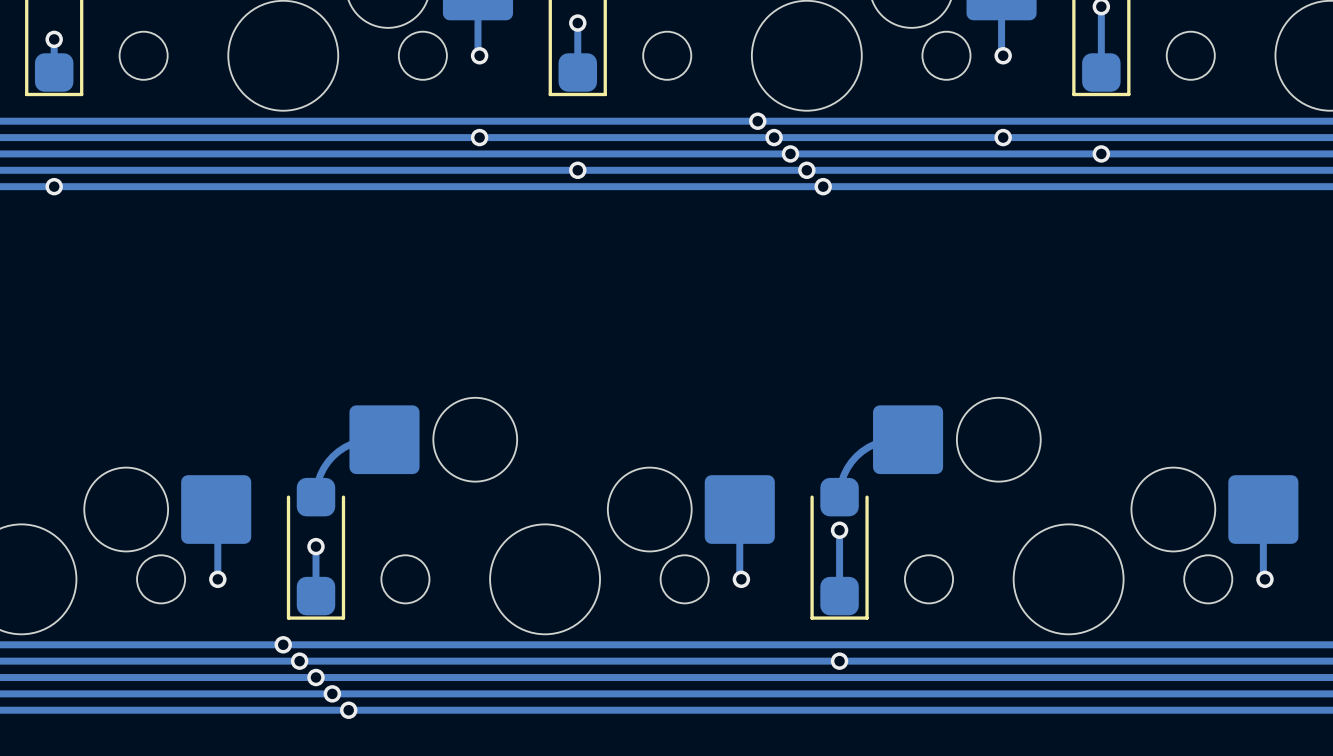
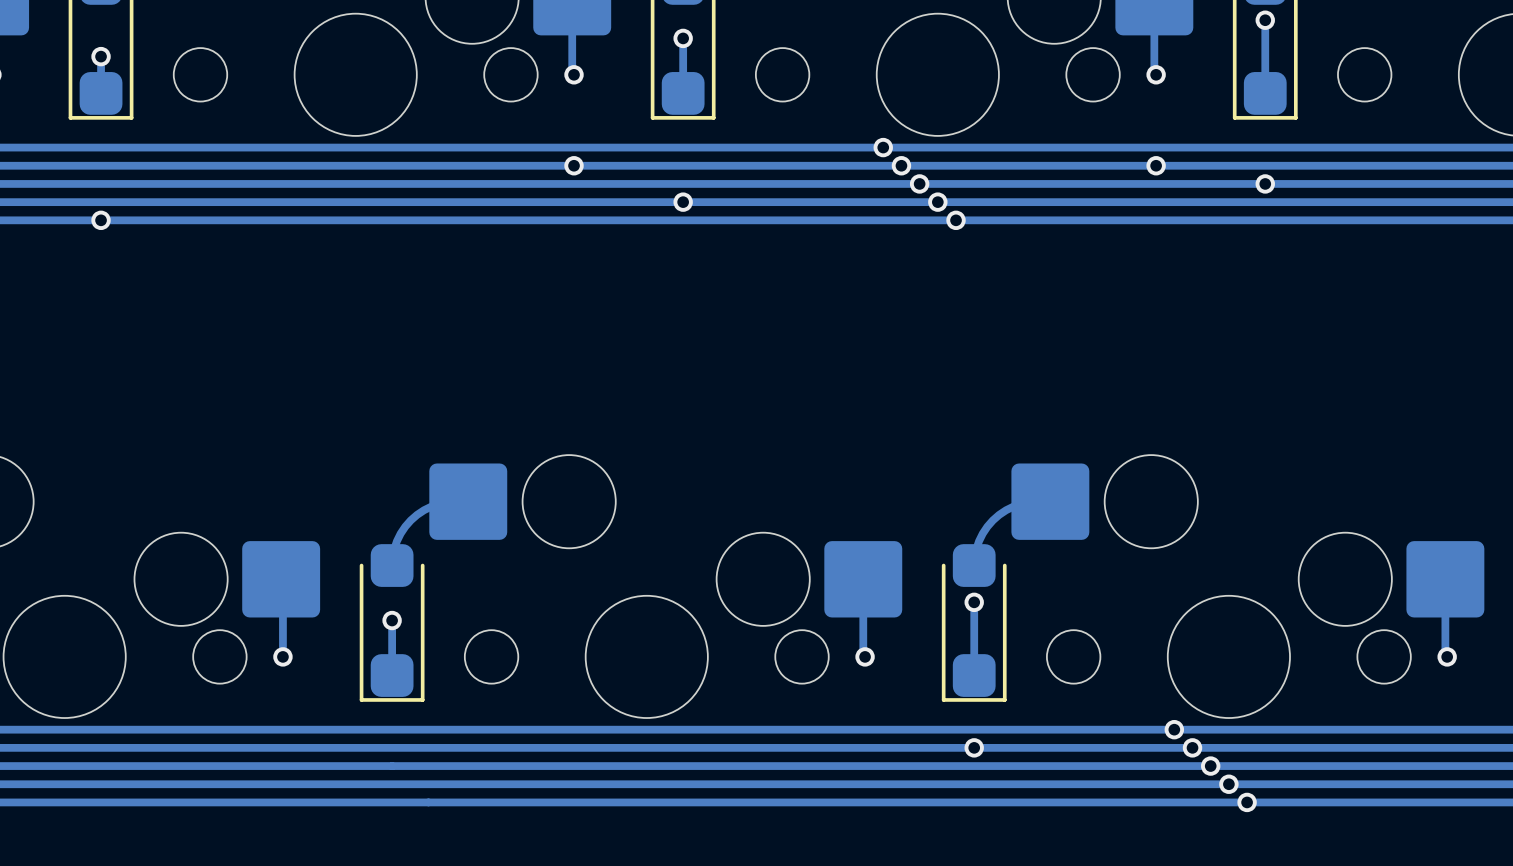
via: (283, 644) -> none
via: none -> (1174, 729)
via: (299, 661) -> none
via: none -> (1192, 747)
via: (315, 677) -> none
via: none -> (1210, 766)
via: (332, 693) -> none
via: none -> (1228, 784)
via: (348, 710) -> none
via: none -> (1247, 802)

